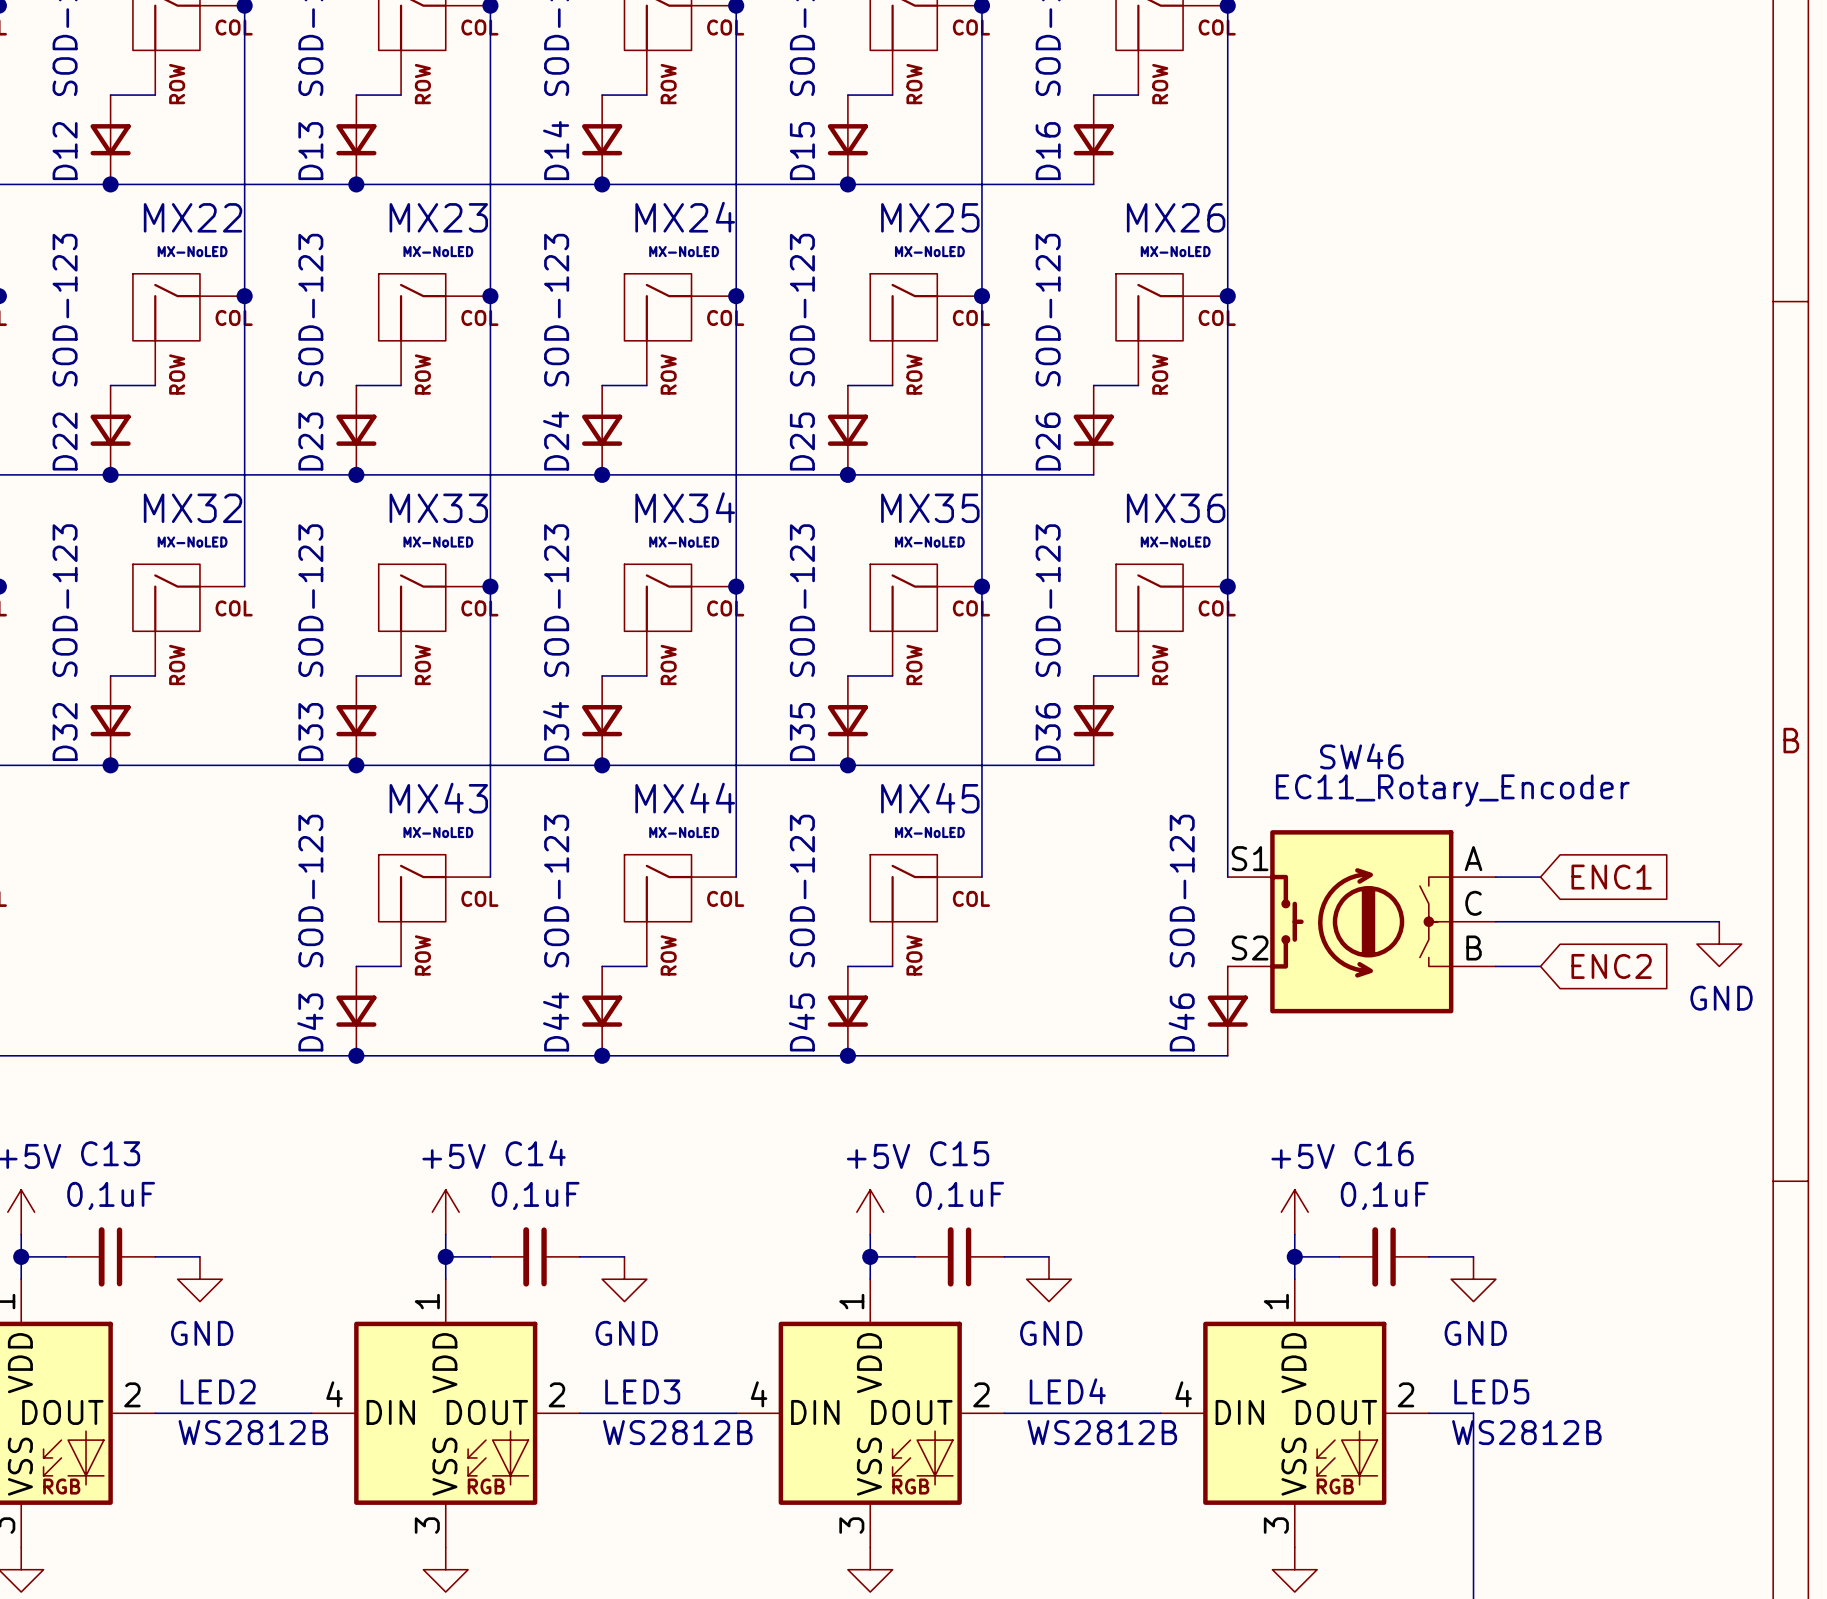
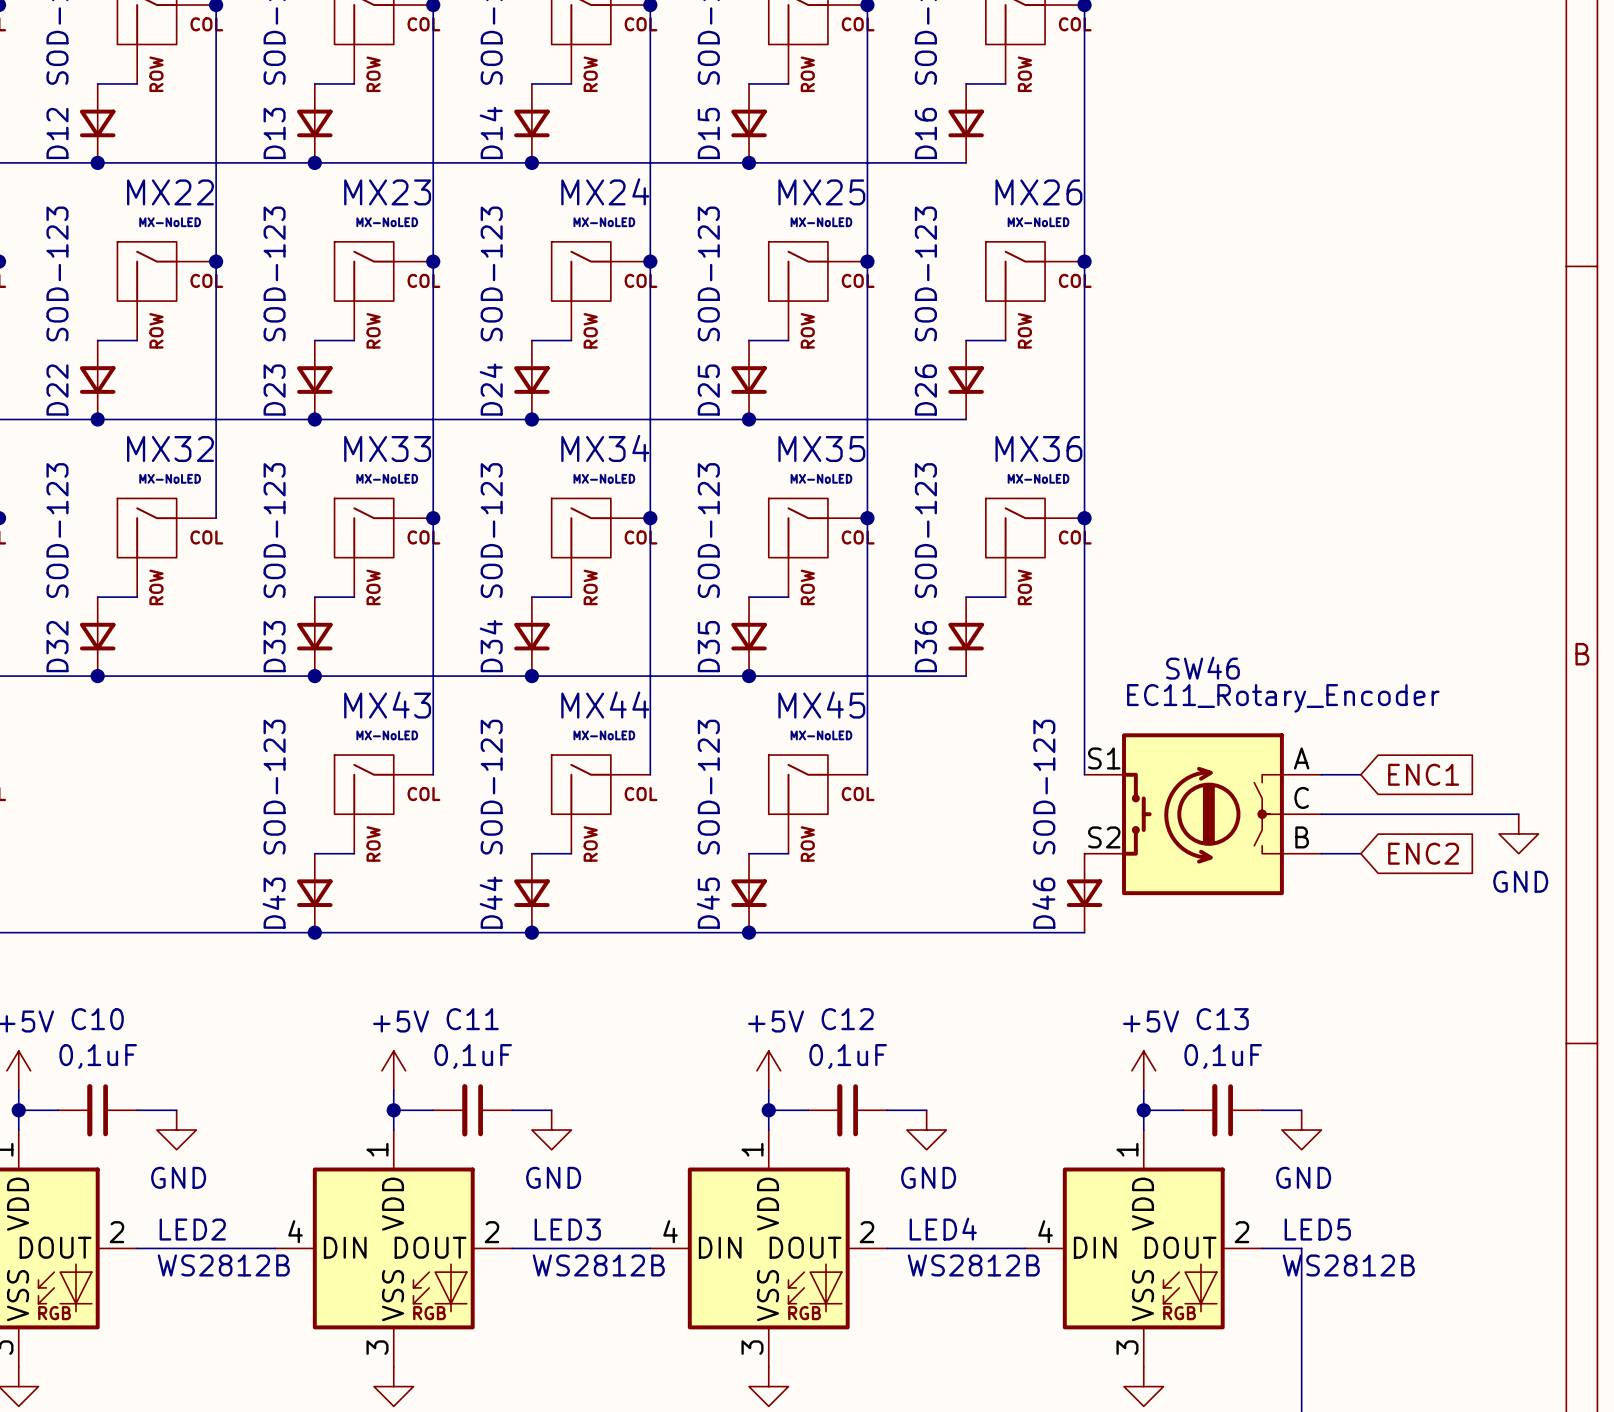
C13 name: C13 (110, 1153) -> C10 (97, 1019)
C14 name: C14 (535, 1153) -> C11 (472, 1019)
C15 name: C15 (959, 1153) -> C12 (847, 1019)
C16 name: C16 (1384, 1153) -> C13 (1222, 1019)

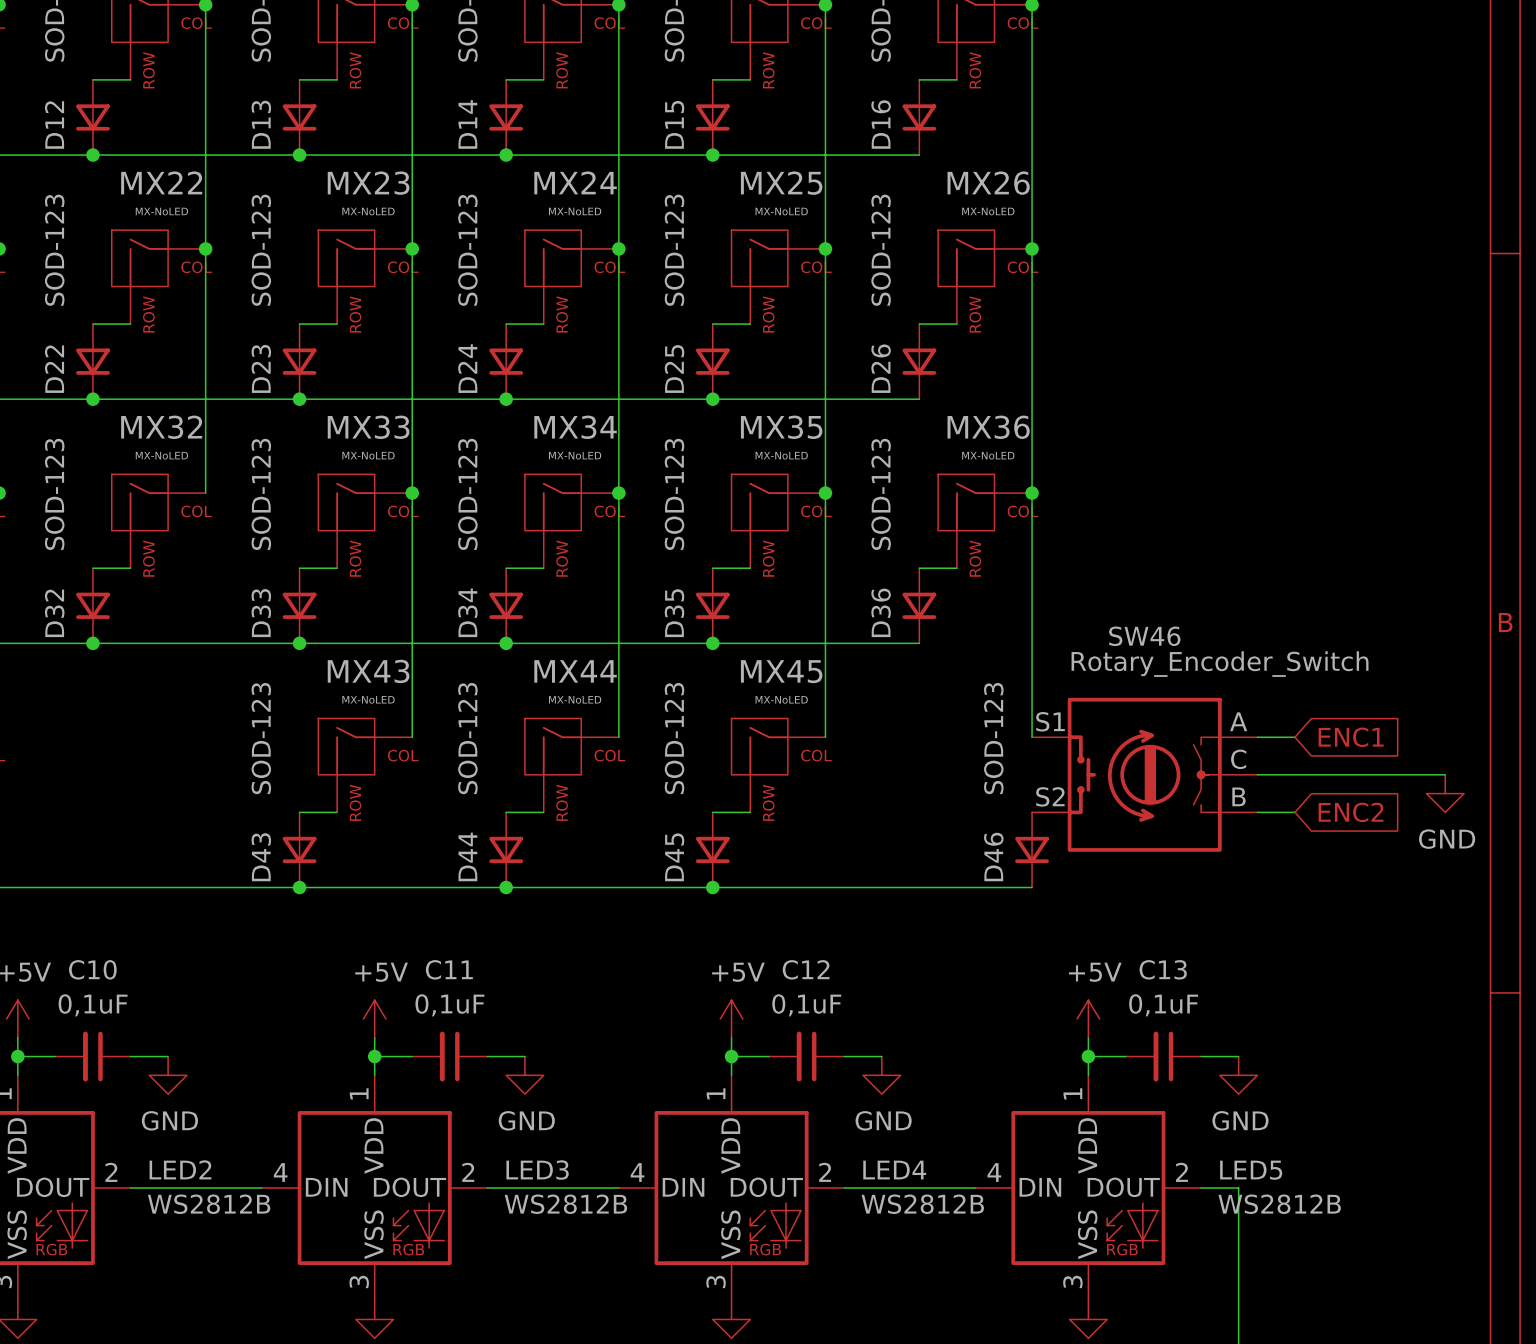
SW46 value: EC11_Rotary_Encoder (1283, 698) -> Rotary_Encoder_Switch (1220, 664)

